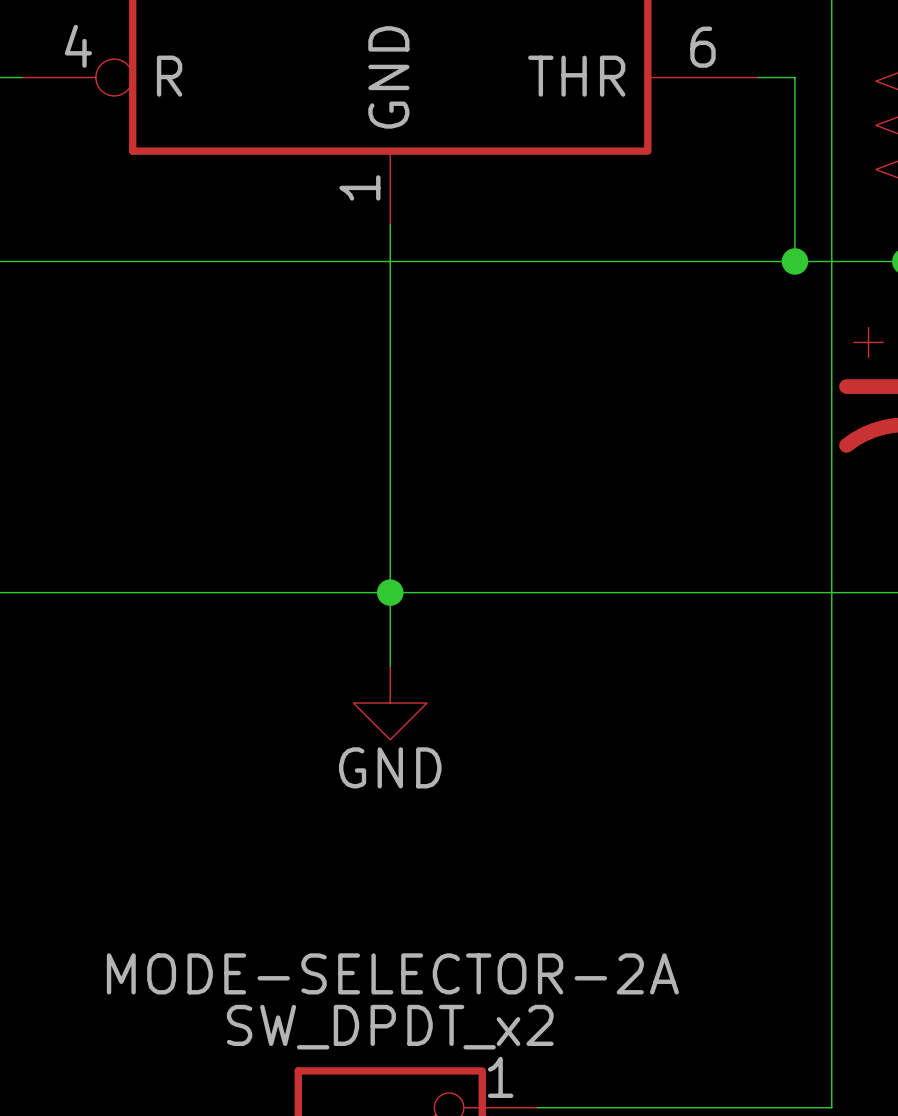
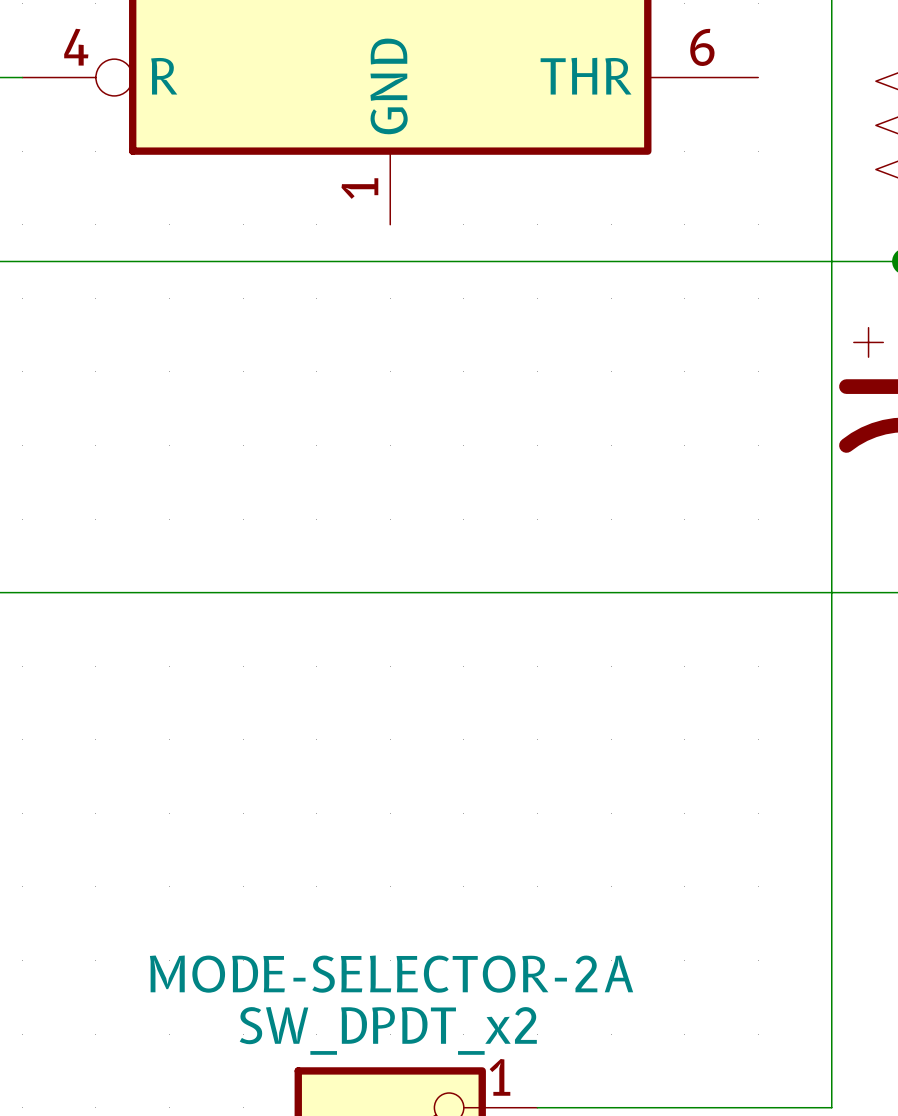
wire: (758, 77) (794, 77) (794, 261) -> none
wire: (390, 224) (390, 666) -> none
junction: (794, 261) -> none
junction: (390, 592) -> none
power symbol: GND (390, 703) -> none

